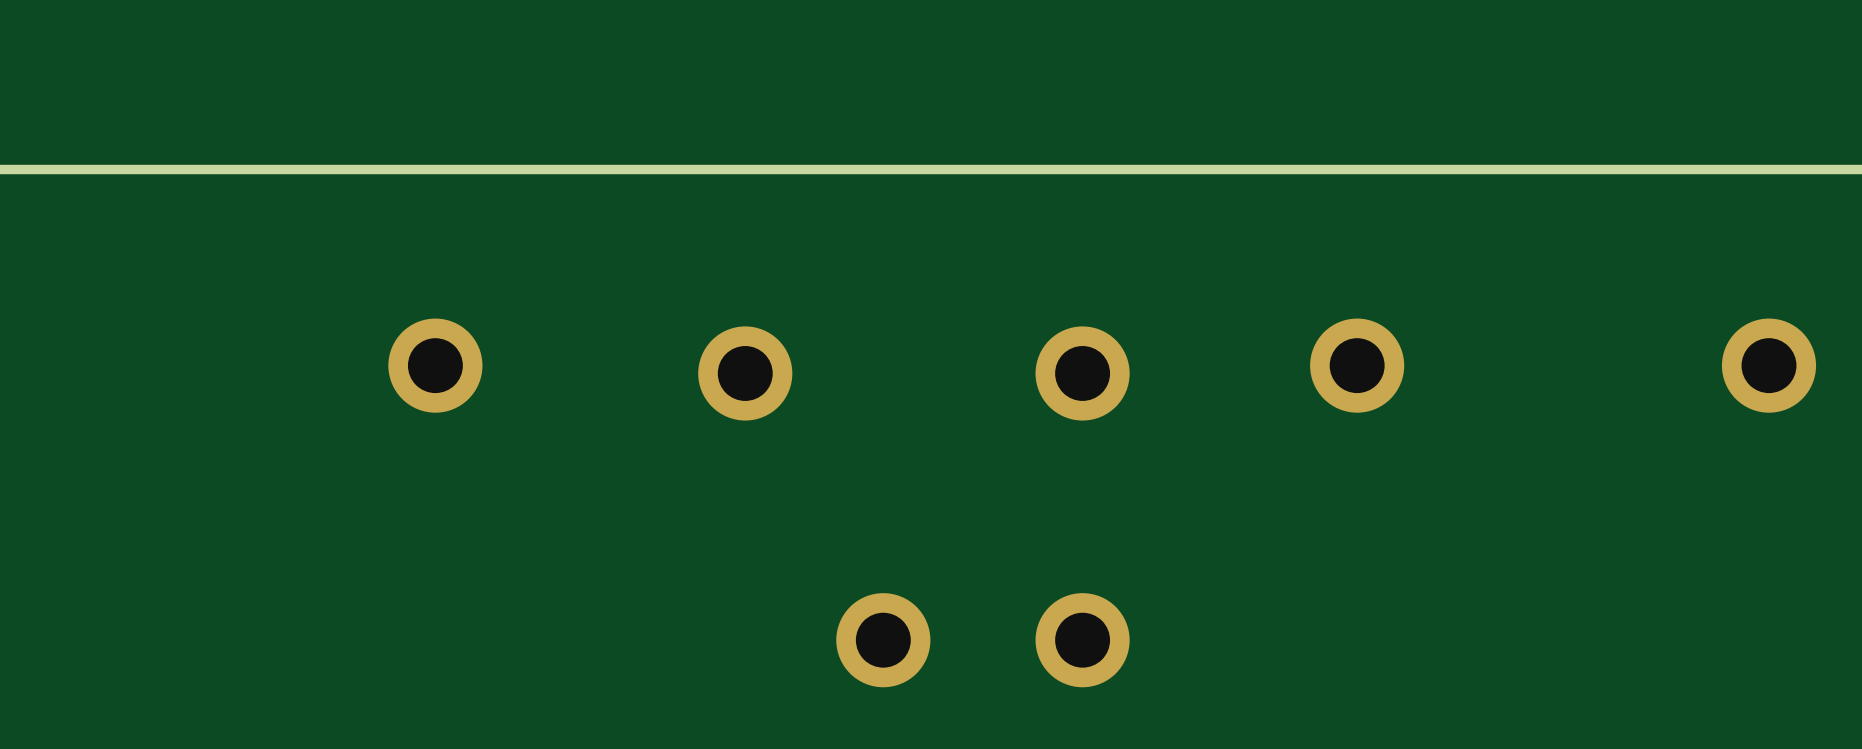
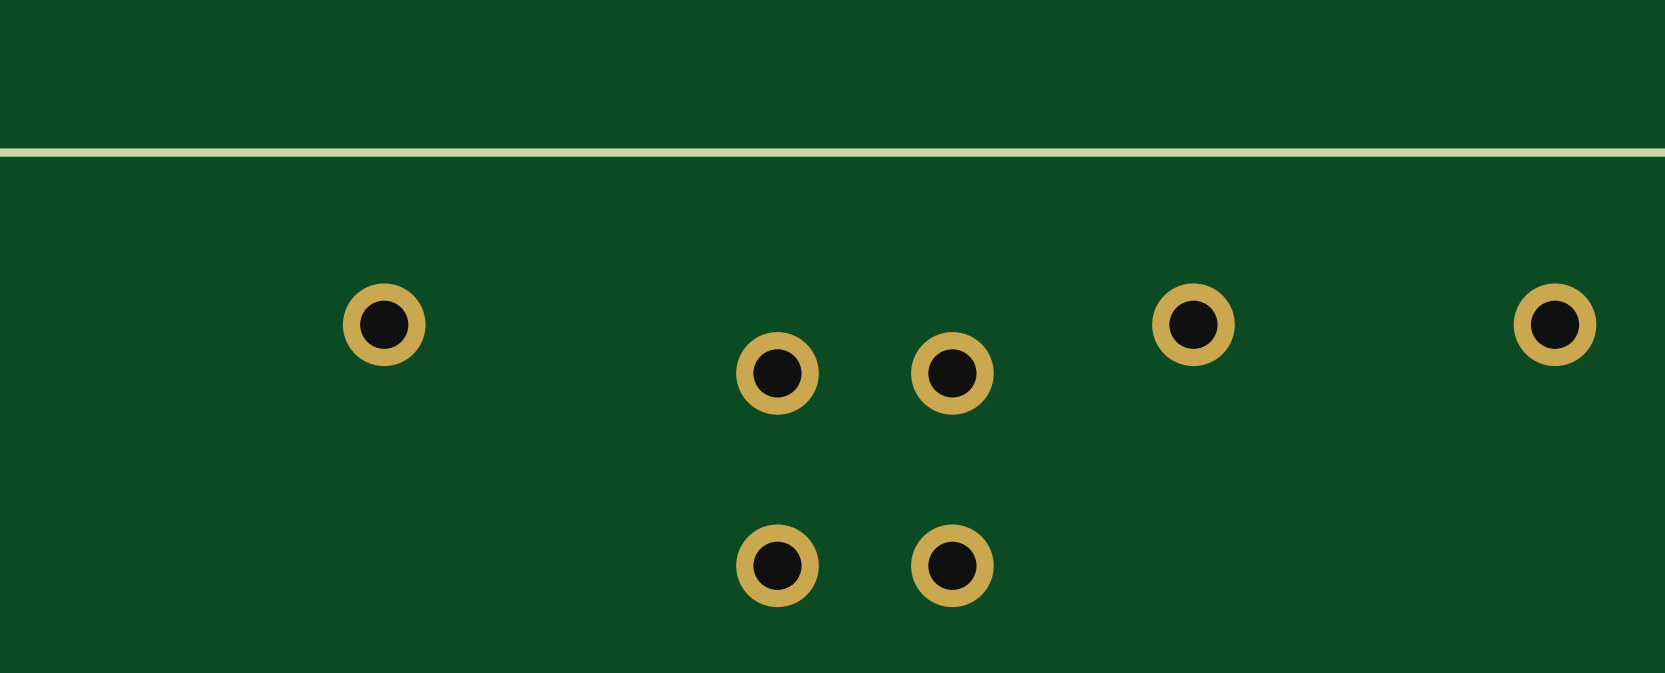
via: (745, 373) -> none
via position: (1082, 373) -> (952, 373)
via: none -> (777, 373)

